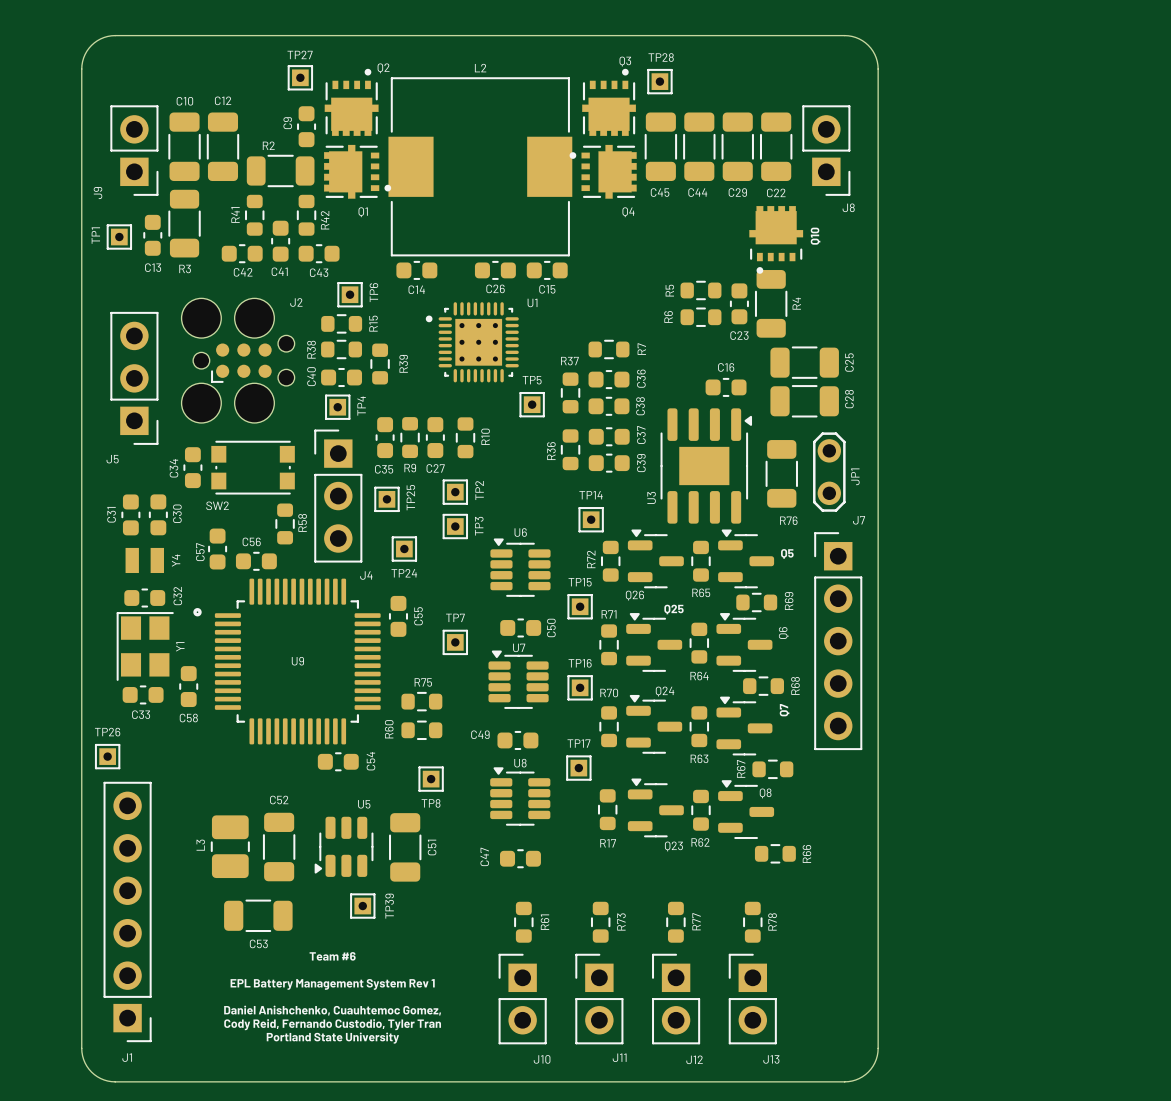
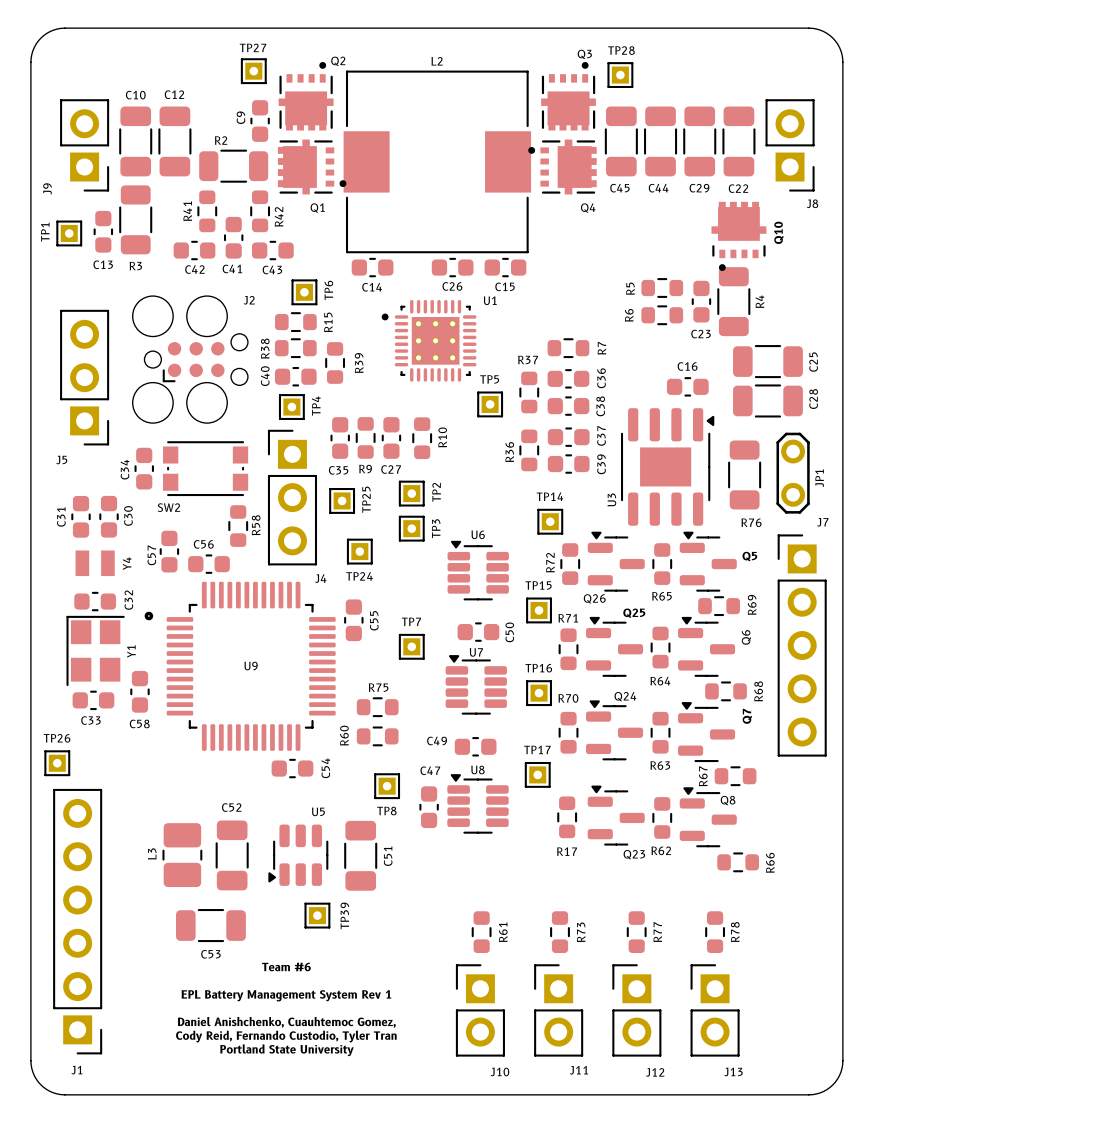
C47 rotation: 0° (520, 858) -> 90° clockwise (429, 807)
C47 position: (520, 858) -> (429, 807)

